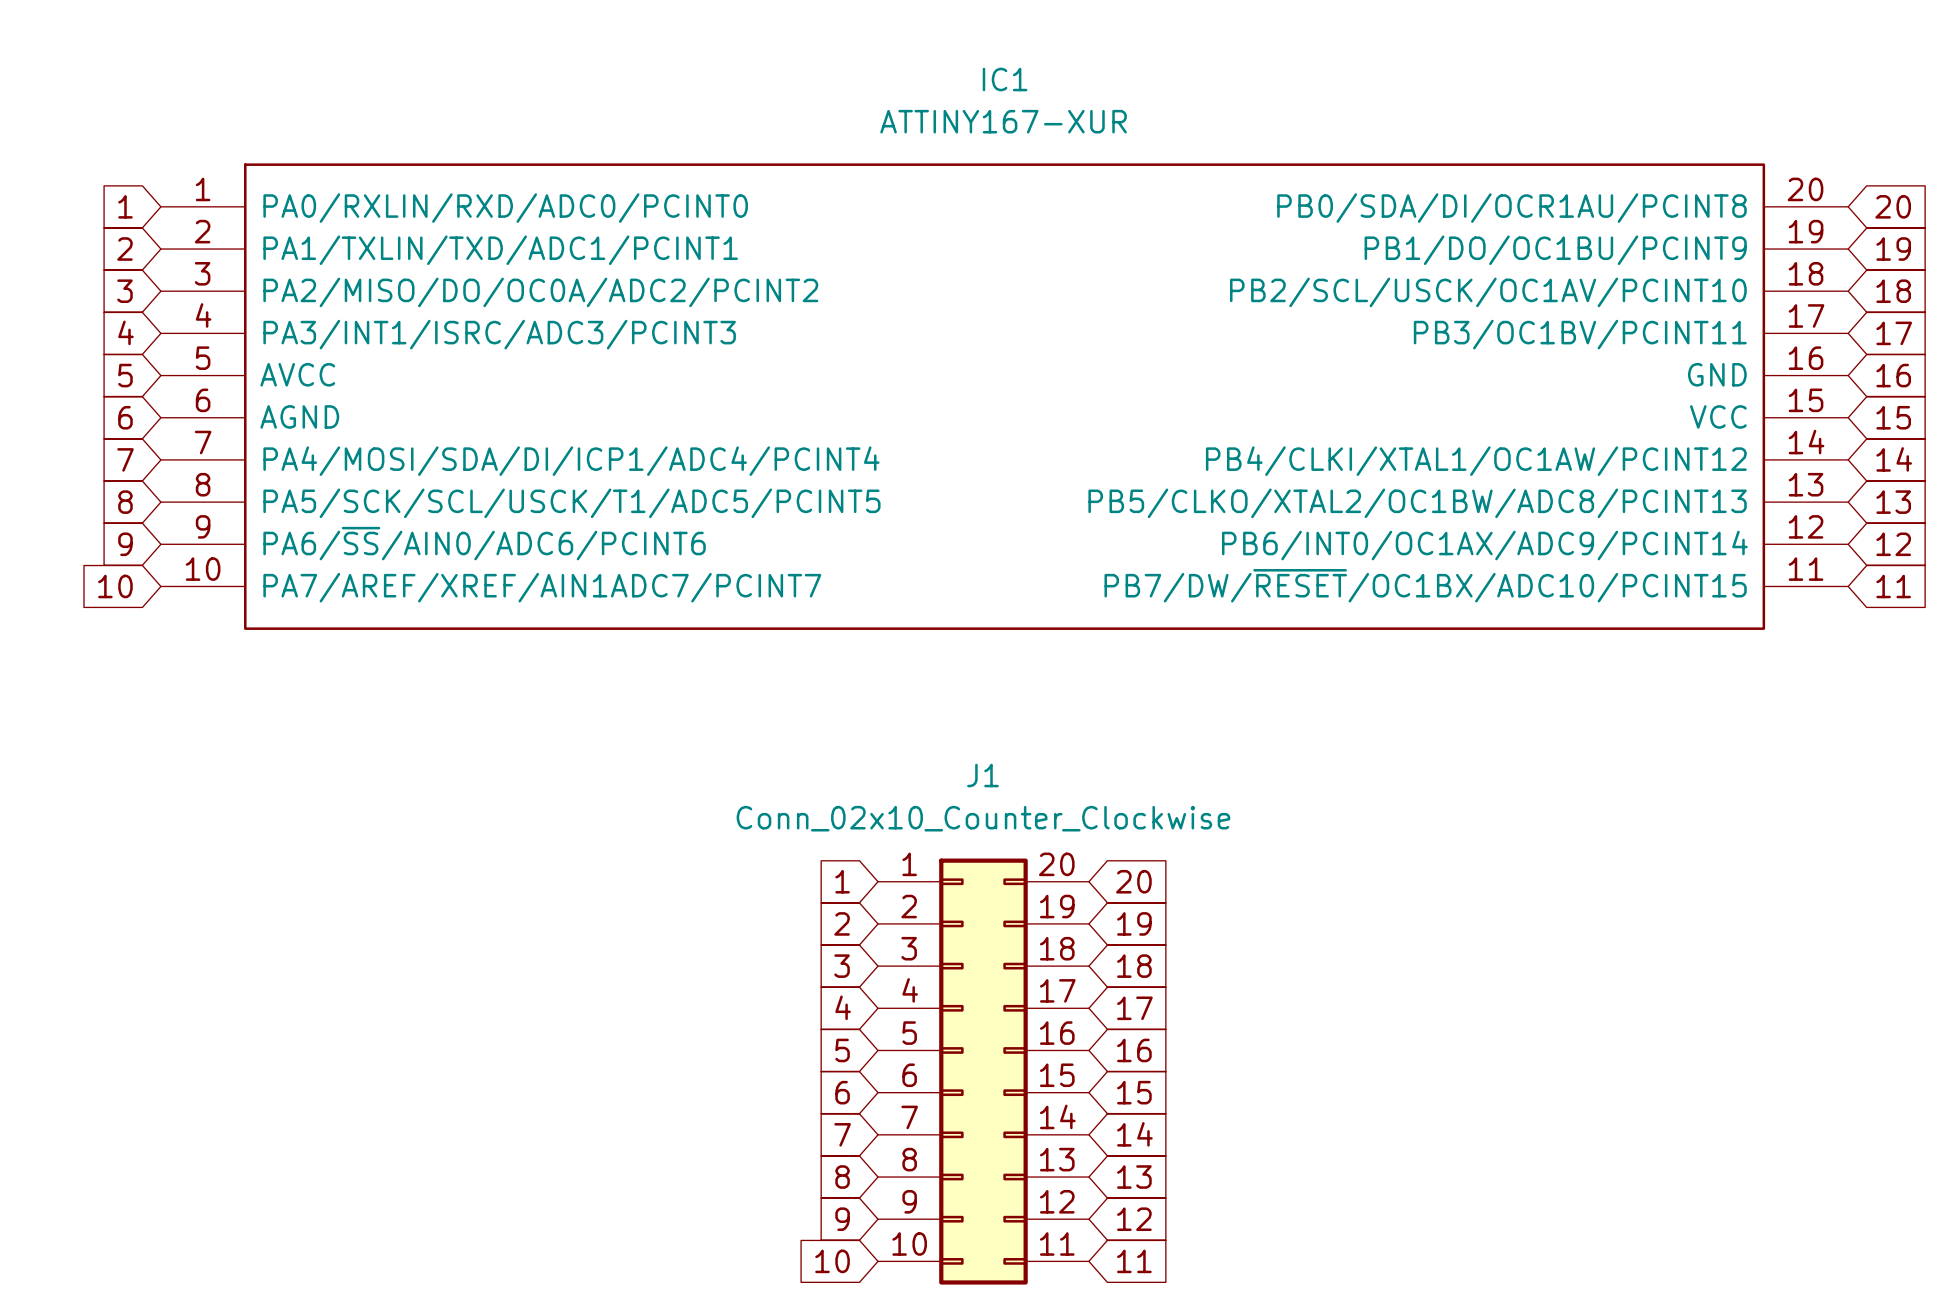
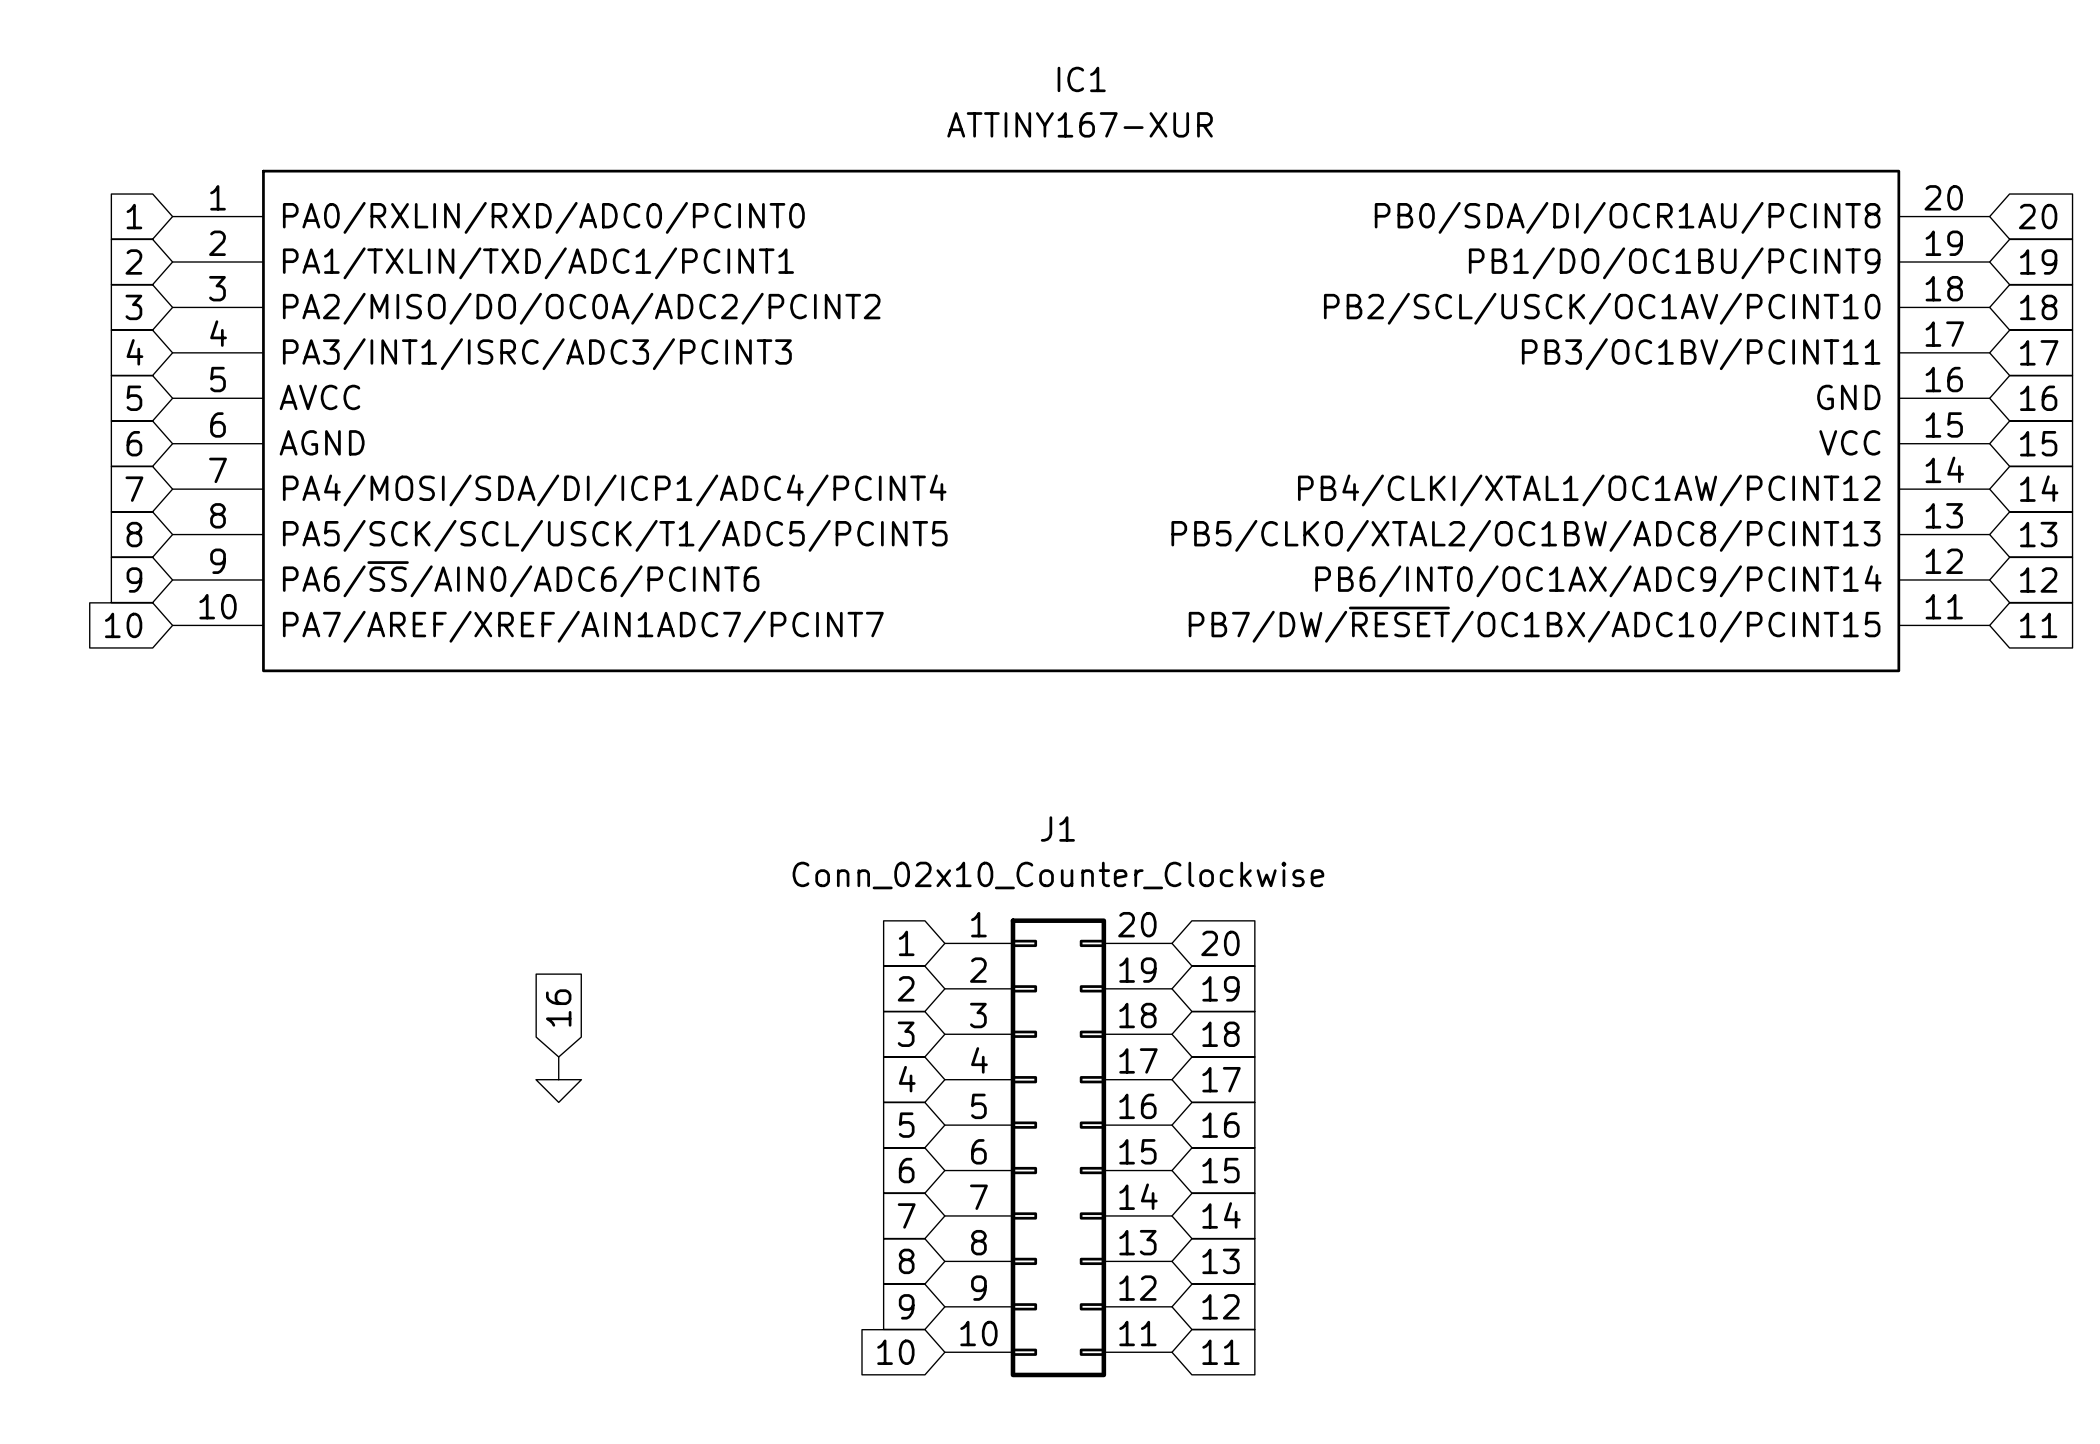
global label: none -> 16 (558, 1008)
power symbol: none -> (558, 1079)

